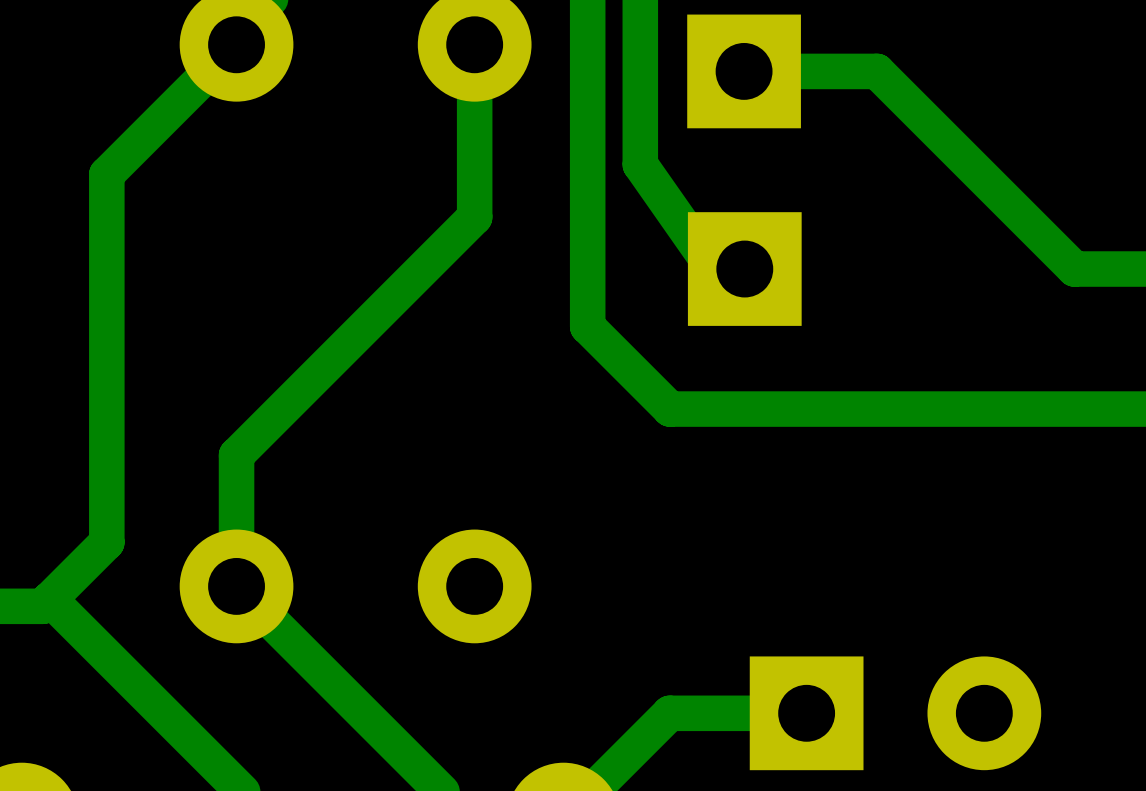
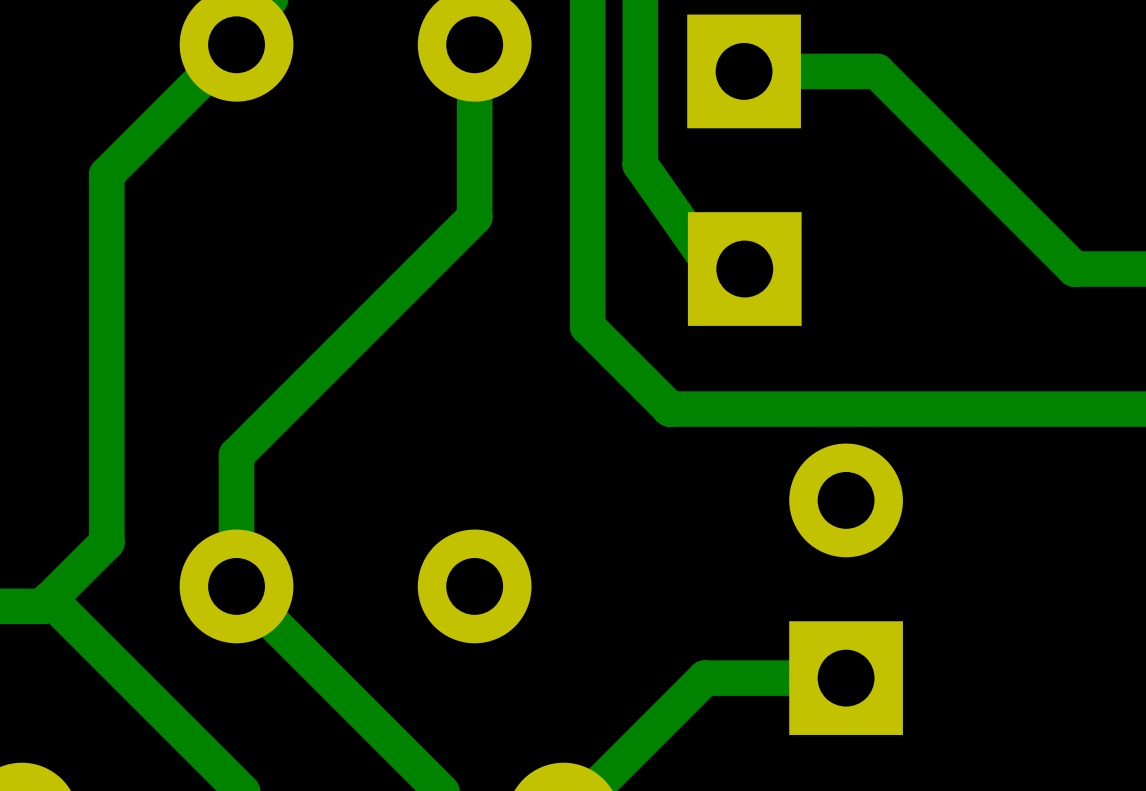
track: (806, 713) (669, 713) -> (846, 678) (704, 678) (669, 713)
part rotation: 0° (895, 713) -> 90° counterclockwise (846, 589)

